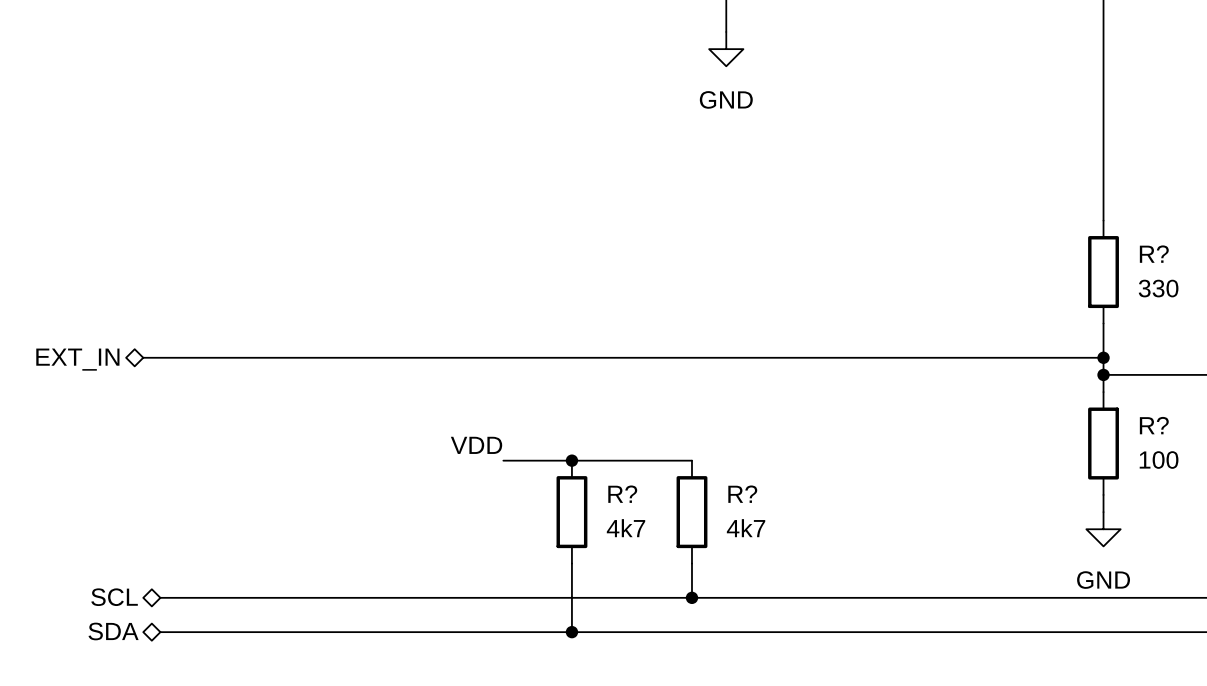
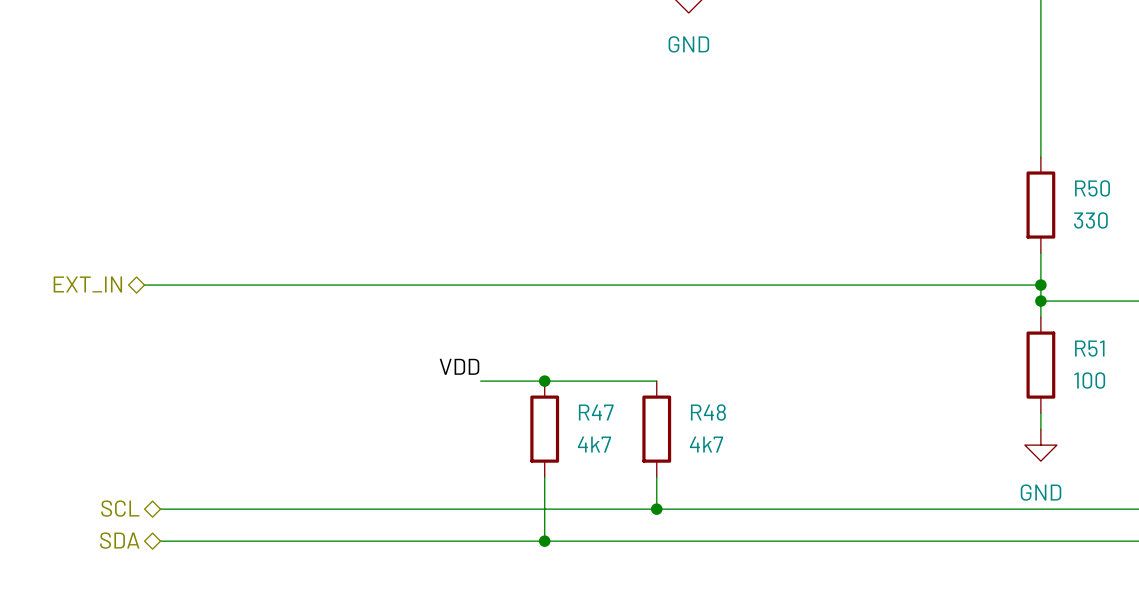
R? name: R? (1154, 254) -> R50 (1092, 188)
R? name: R? (1154, 425) -> R51 (1089, 348)
R? name: R? (622, 494) -> R47 (596, 412)
R? name: R? (742, 494) -> R48 (708, 412)

